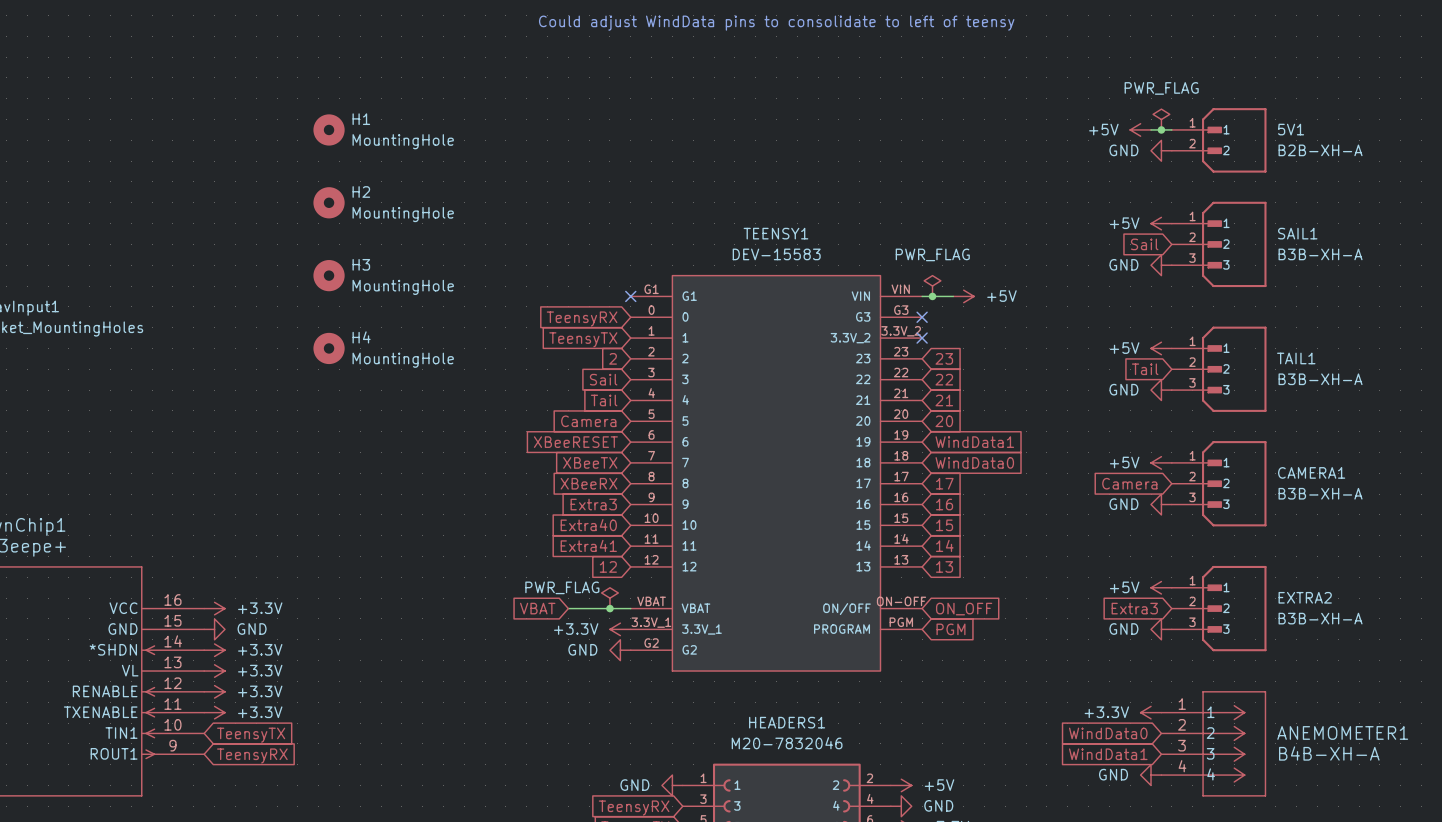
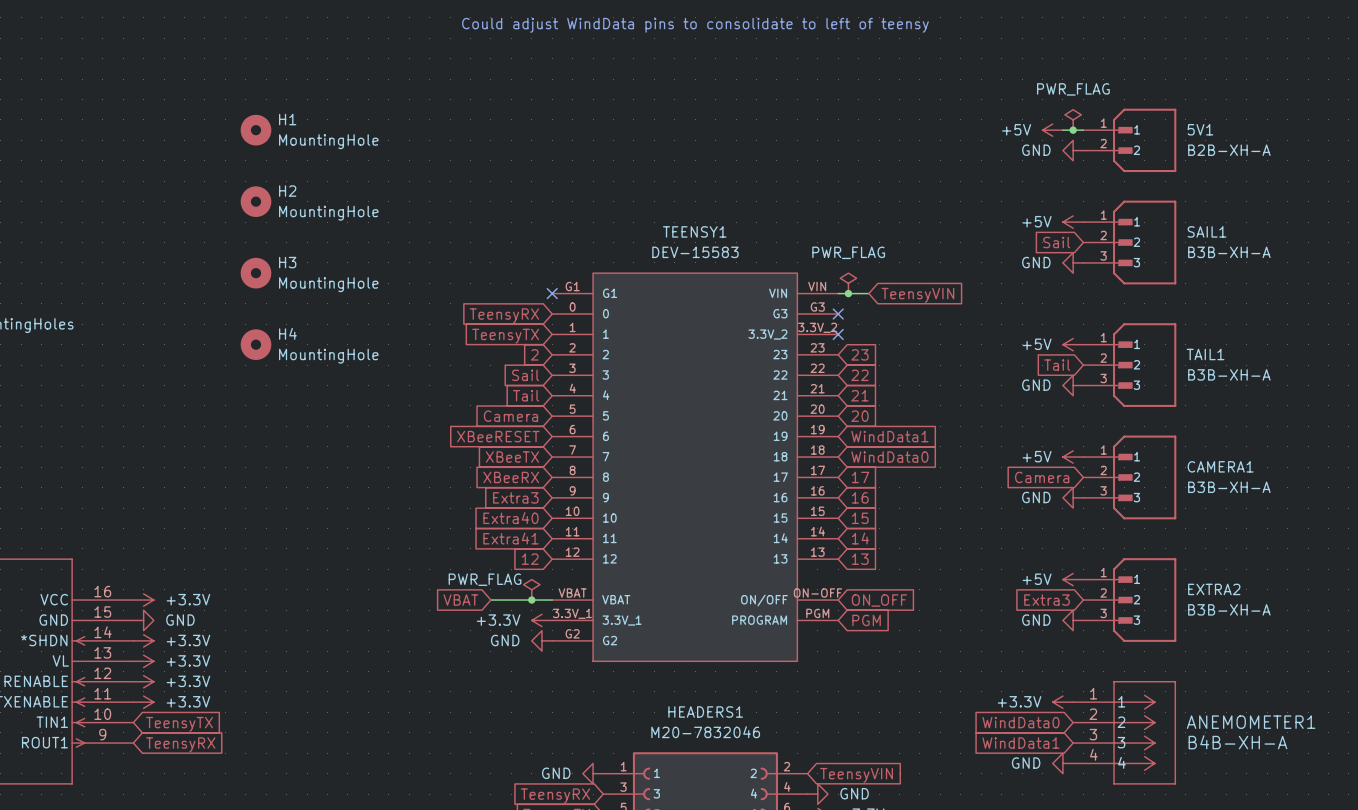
power symbol: +5V (963, 296) -> none
global label: none -> TeensyVIN (917, 295)
power symbol: +5V (901, 785) -> none
global label: none -> TeensyVIN (856, 775)

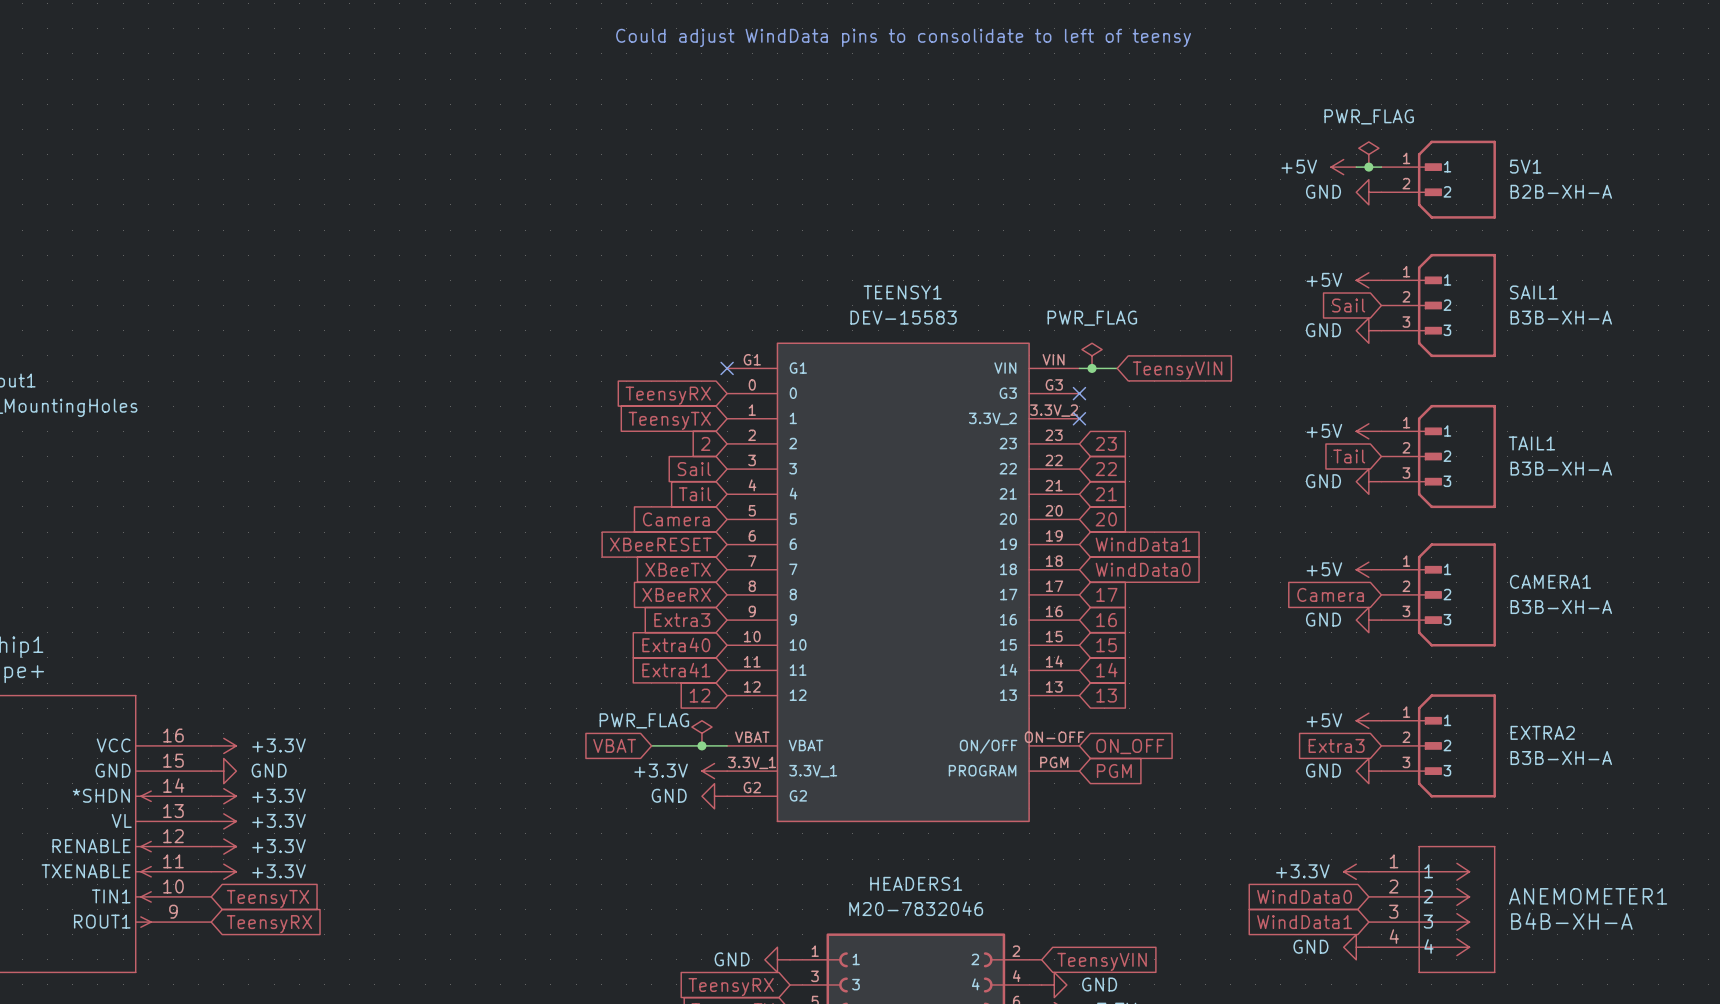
H1: MountingHole (255, 130) -> none
H2: MountingHole (255, 201) -> none
H3: MountingHole (255, 273) -> none
H4: MountingHole (255, 344) -> none

